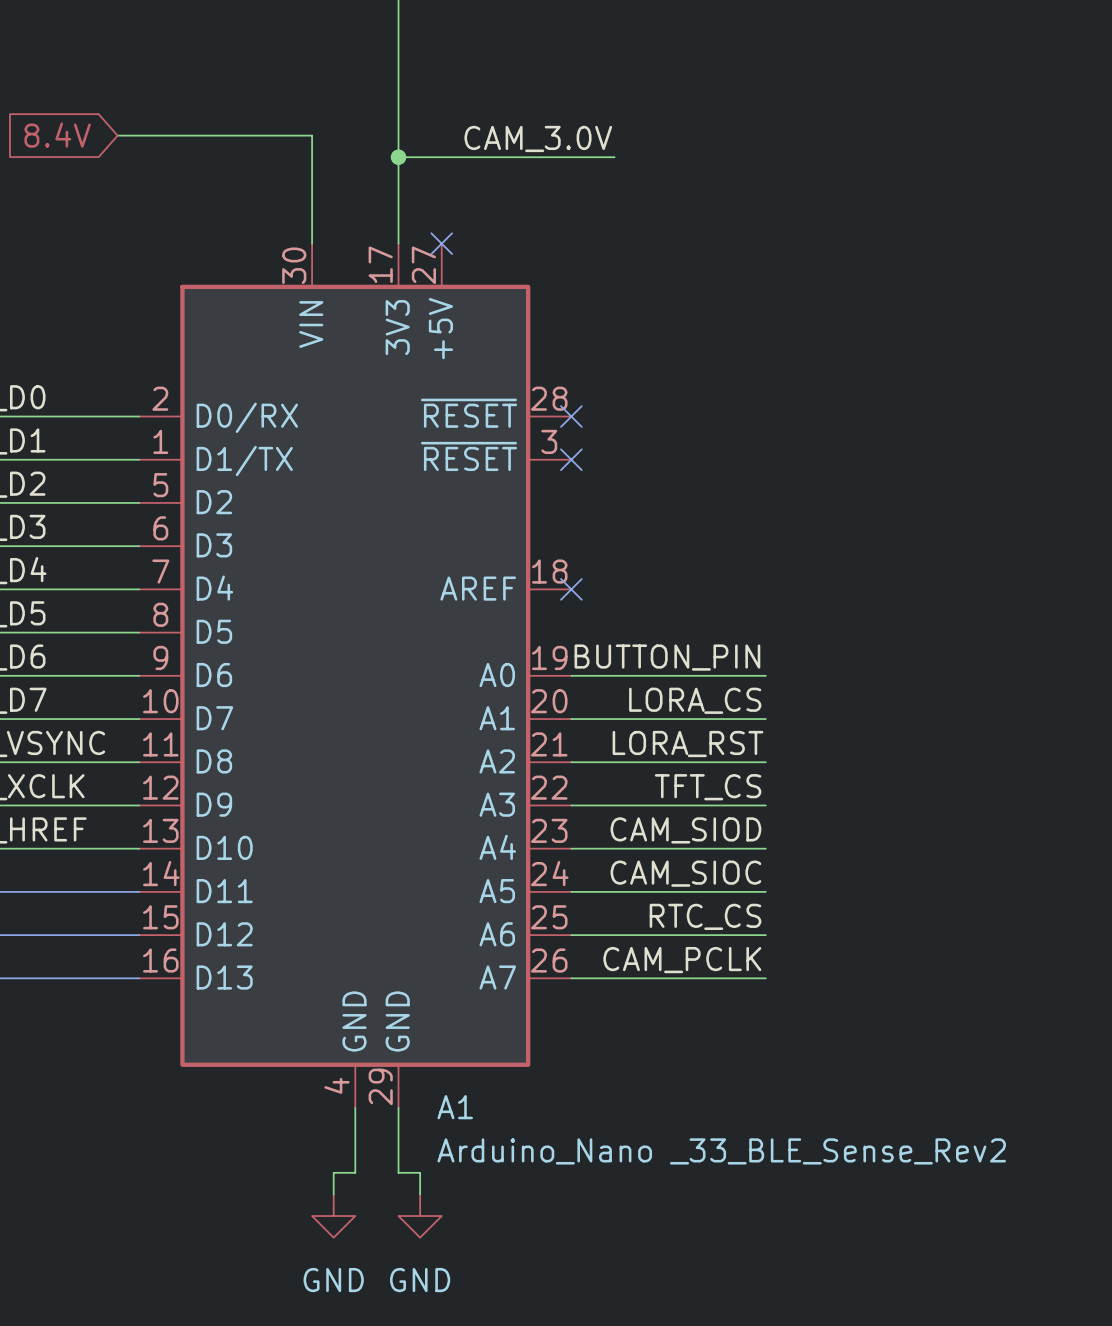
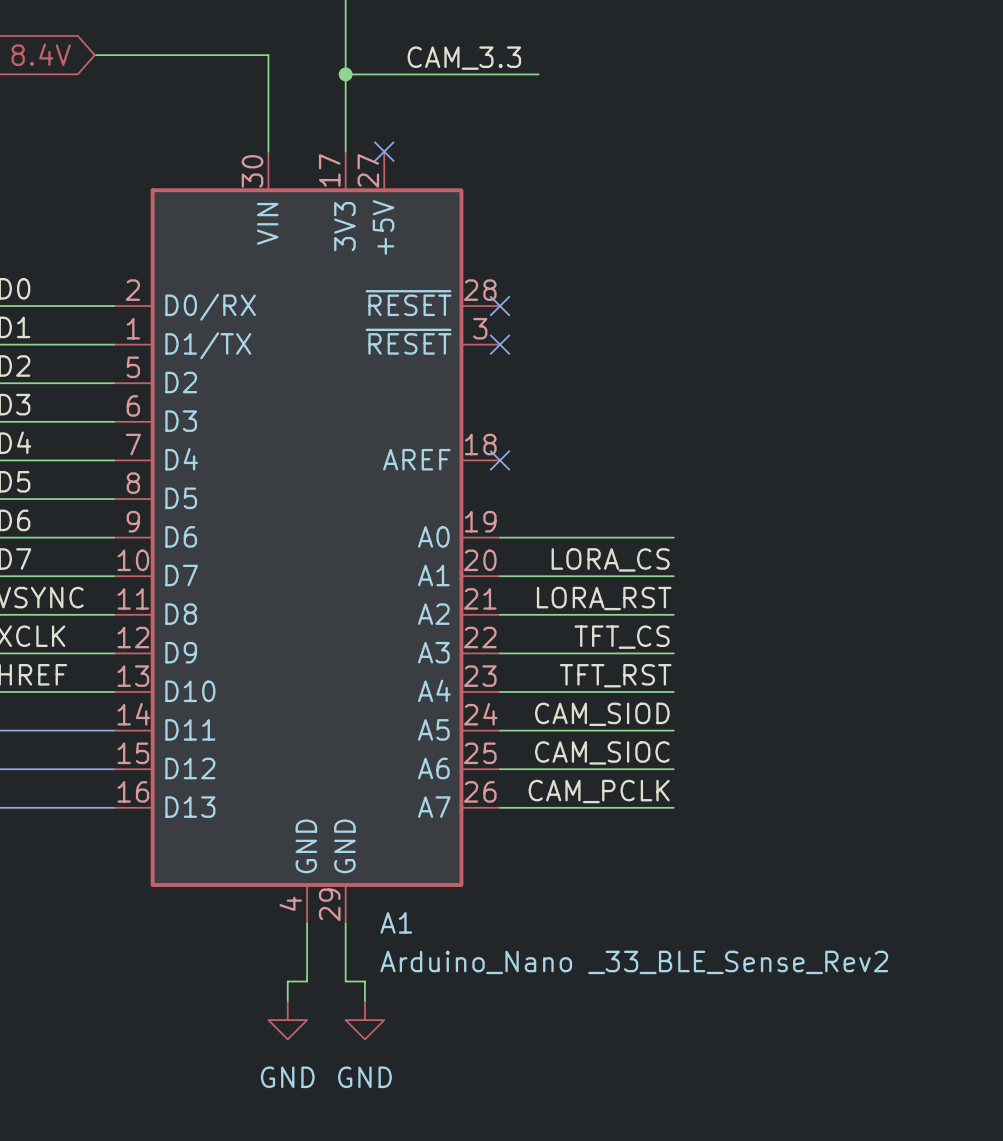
label: CAM_3.0V (538, 138) -> CAM_3.3 (464, 58)
label: BUTTON_PIN (667, 657) -> none
label: CAM_SIOD (685, 830) -> TFT_RST (615, 675)
label: CAM_SIOC (685, 873) -> CAM_SIOD (602, 714)
label: RTC_CS (705, 916) -> CAM_SIOC (602, 752)

